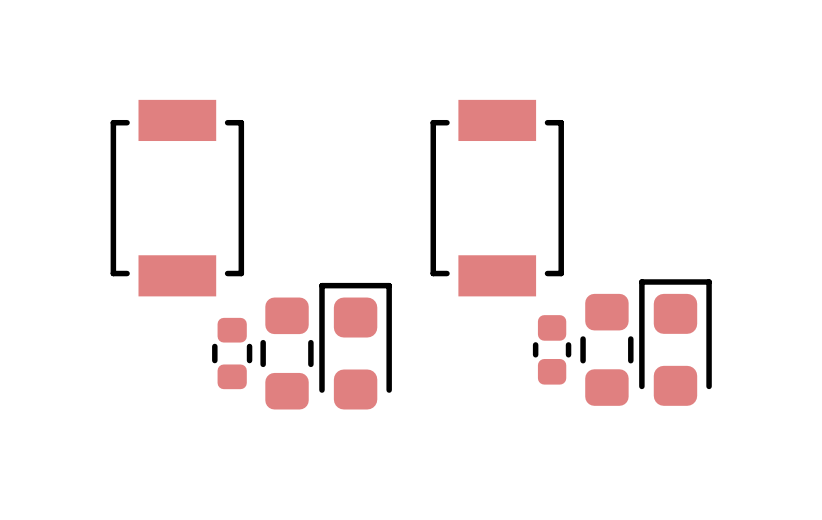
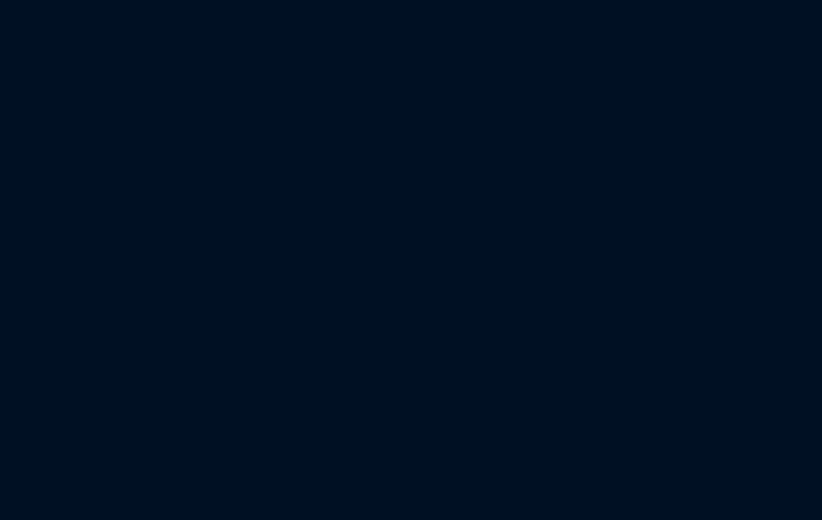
part: (177, 198) -> none
part: (497, 198) -> none
part: (675, 342) -> none
part: (355, 346) -> none
part: (552, 349) -> none
part: (606, 349) -> none
part: (232, 353) -> none
part: (287, 353) -> none

